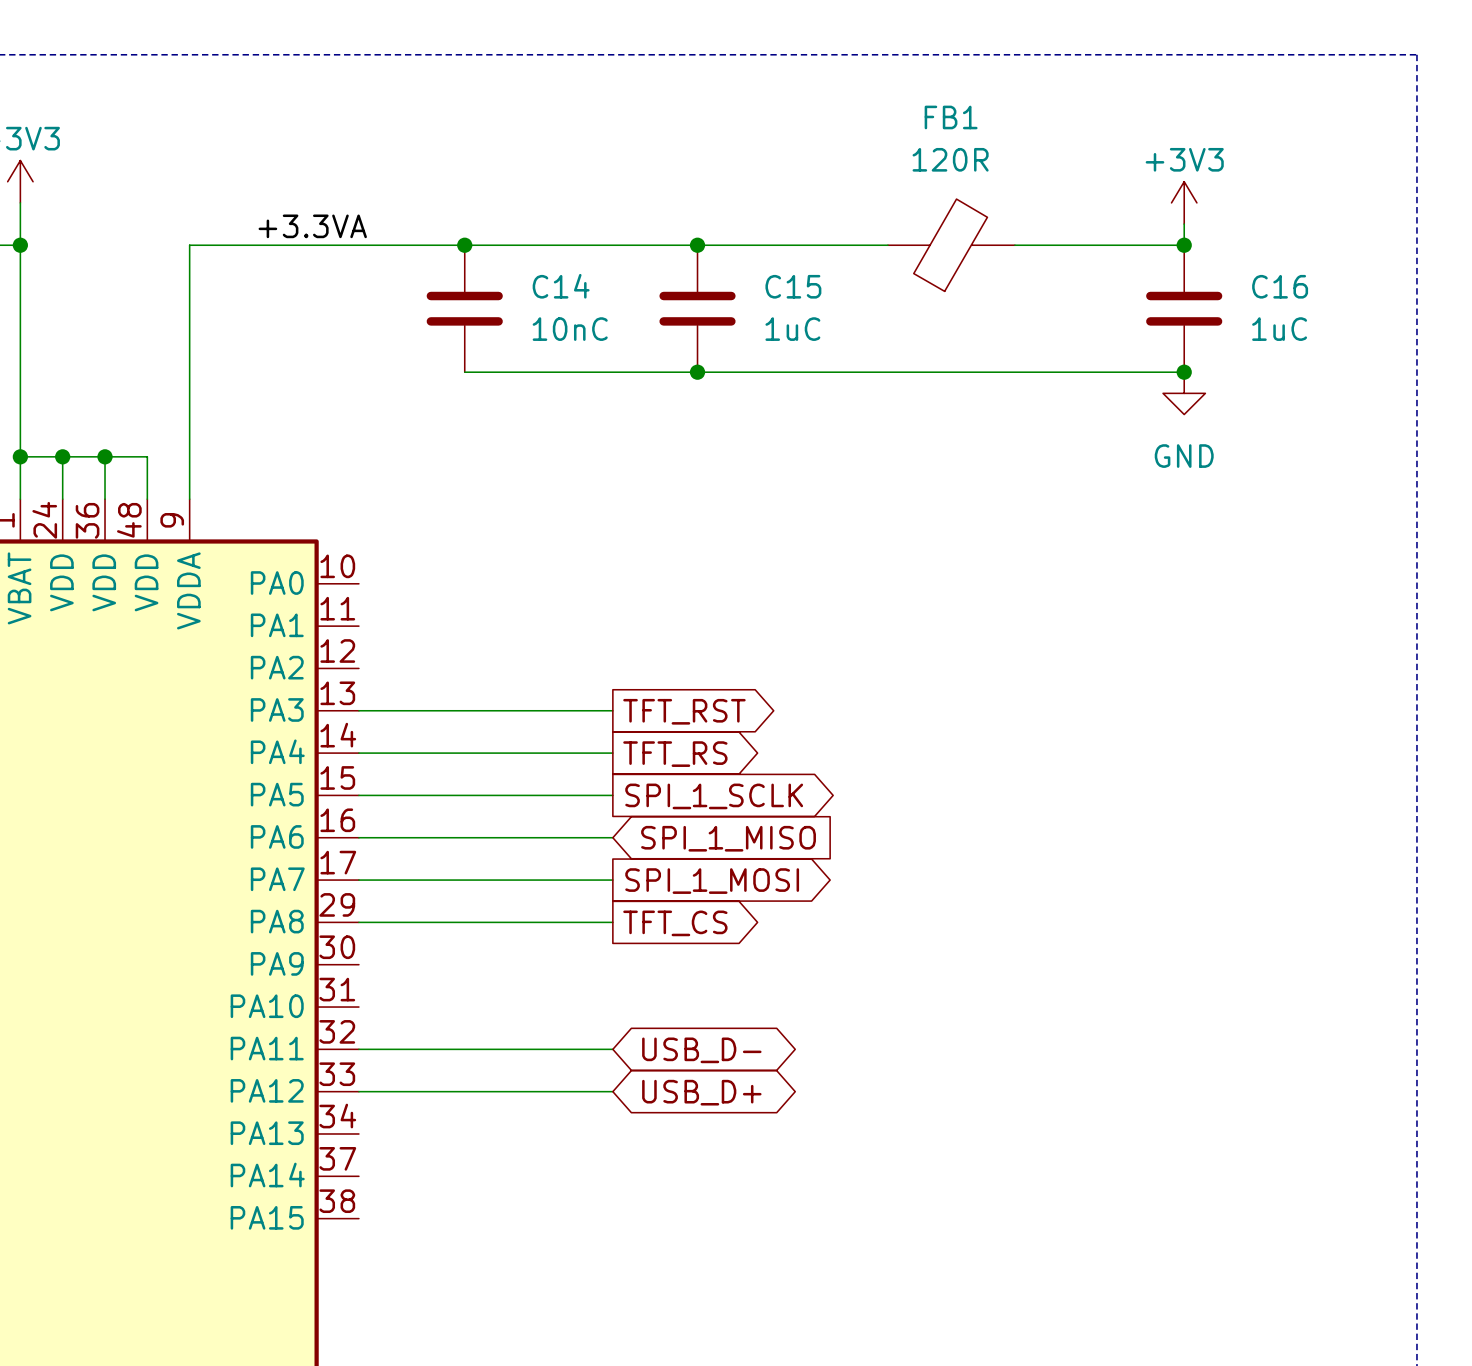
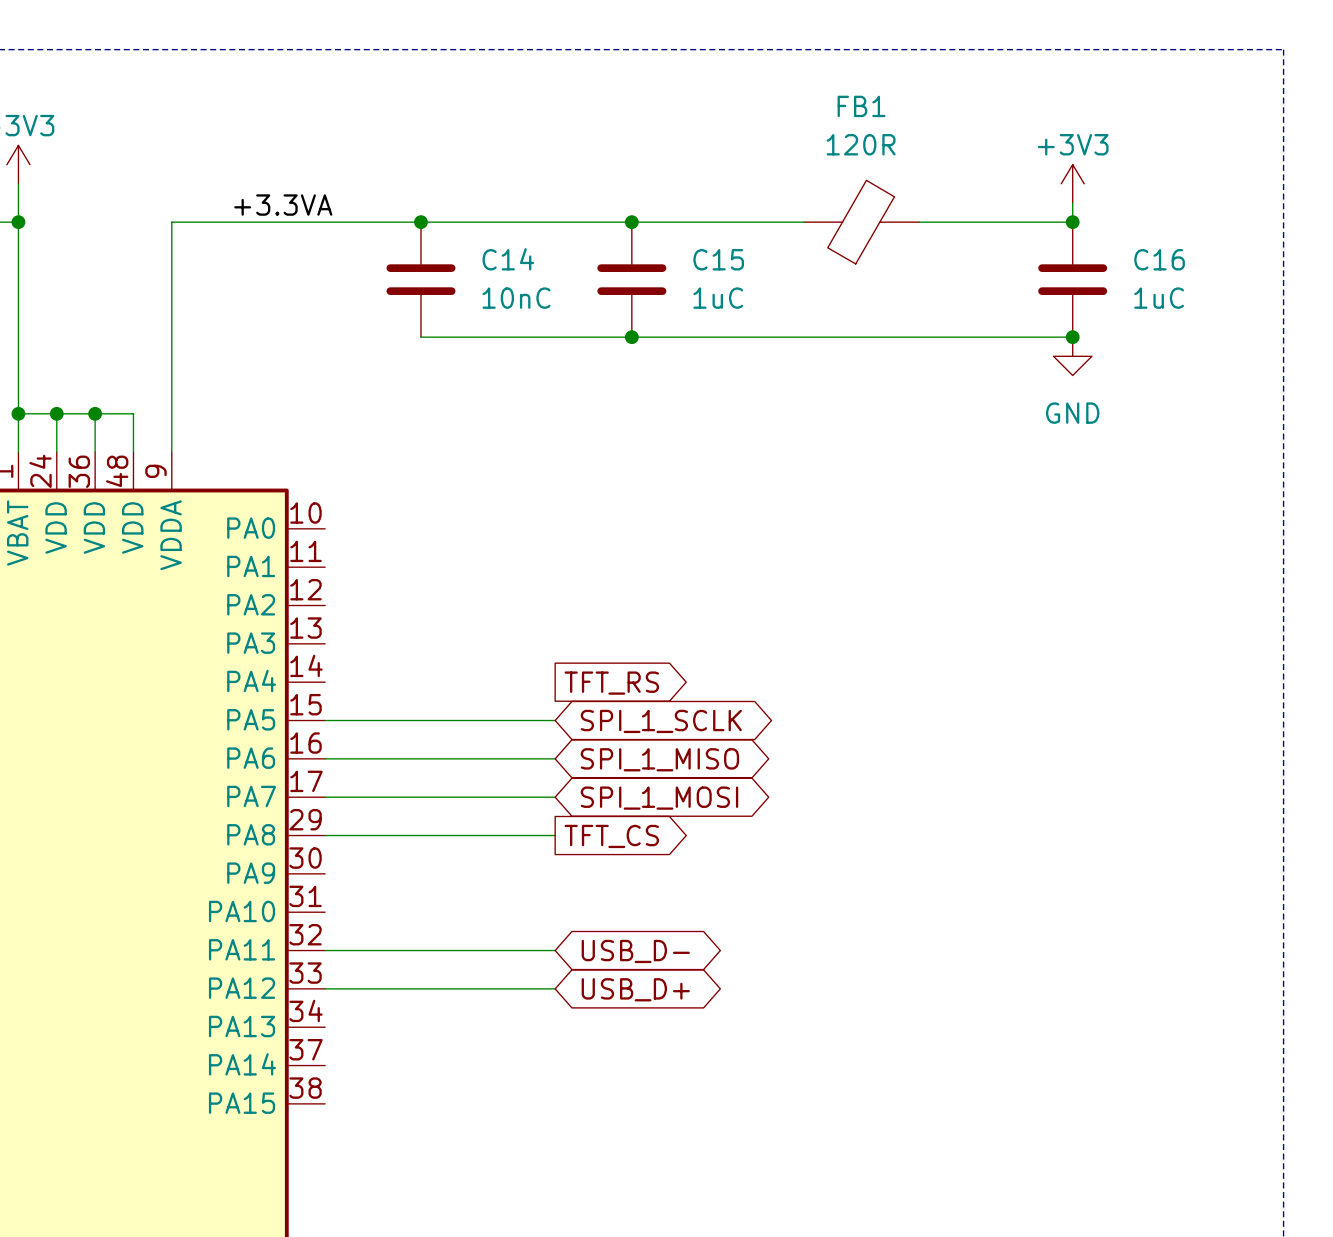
wire: (358, 710) (612, 710) -> none
global label: TFT_RST (684, 711) -> none
wire: (358, 753) (612, 753) -> none
global label shape: output (714, 796) -> bidirectional (661, 721)
global label shape: input (728, 838) -> bidirectional (659, 759)
global label shape: output (712, 881) -> bidirectional (659, 798)

